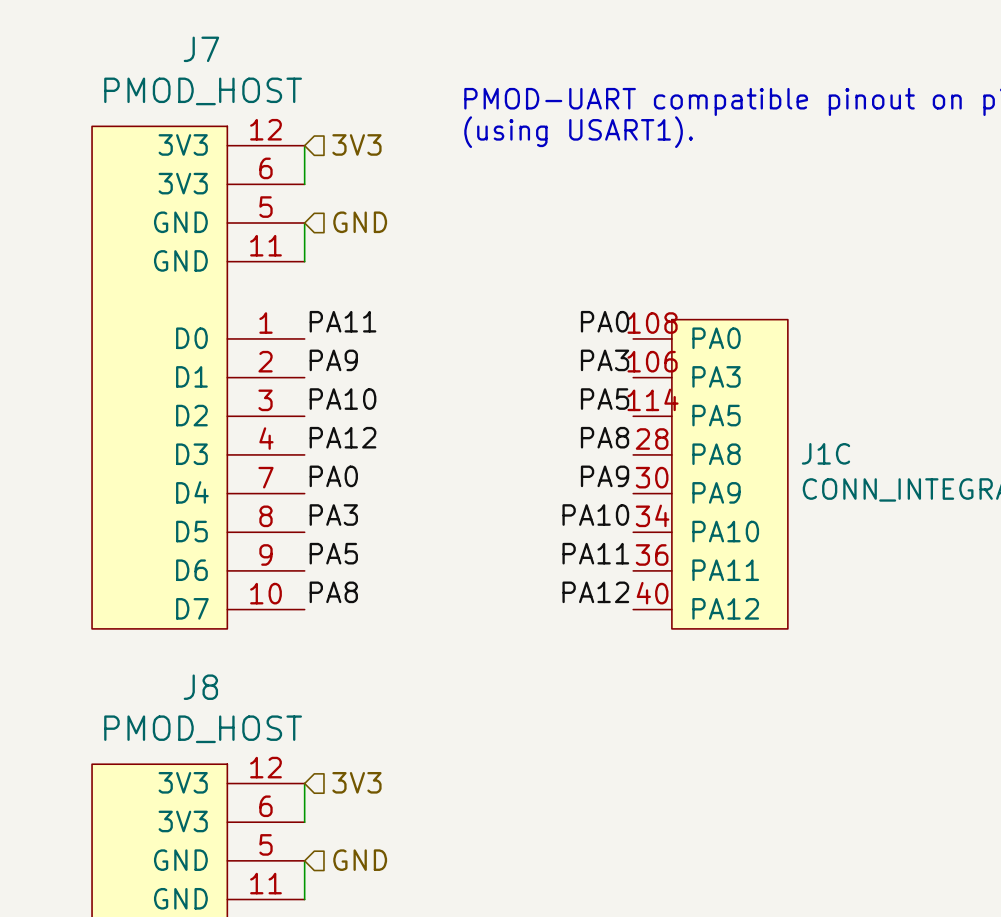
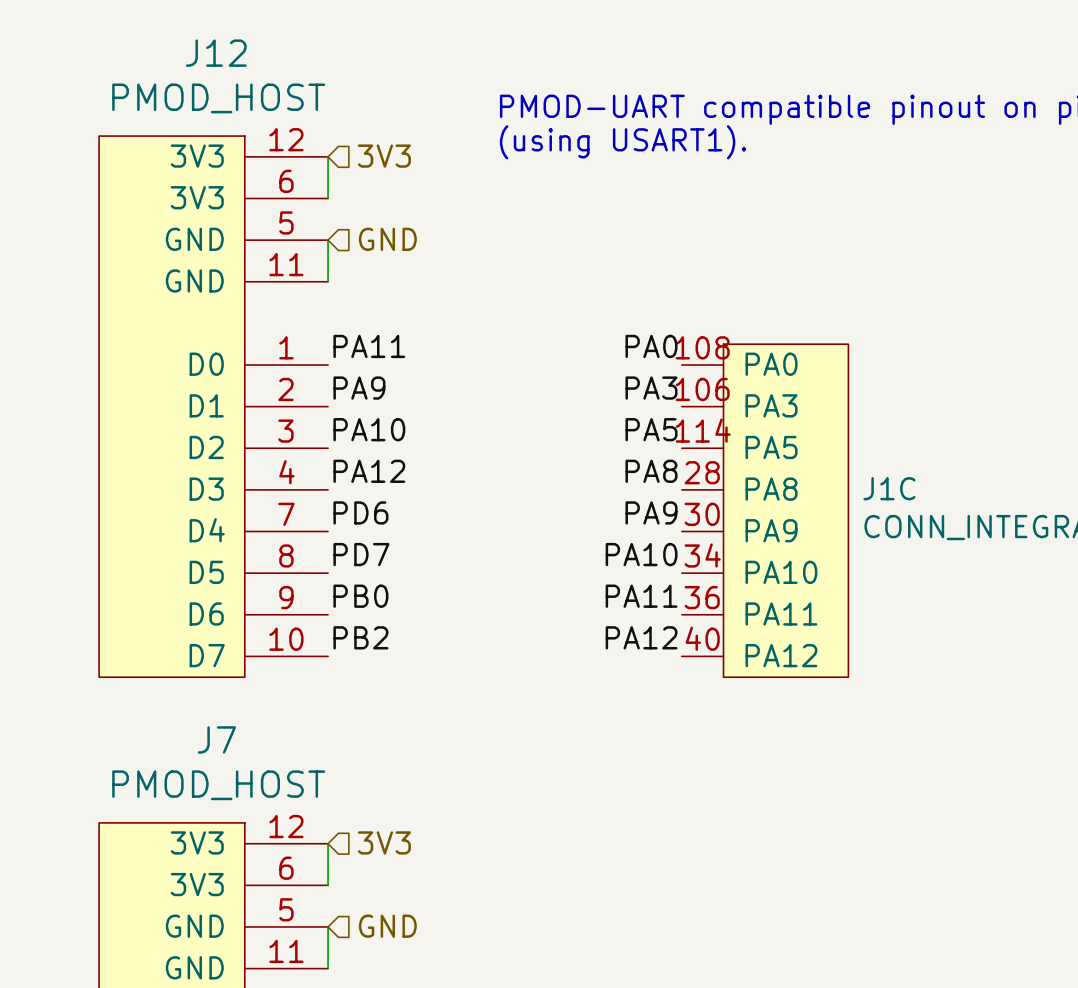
J7 name: J7 (201, 49) -> J12 (216, 53)
label: PA0 (333, 476) -> PD6 (360, 512)
label: PA3 (333, 515) -> PD7 (361, 554)
label: PA5 (333, 553) -> PB0 (360, 596)
label: PA8 (333, 592) -> PB2 (360, 637)
J8 name: J8 (200, 687) -> J7 (216, 739)

